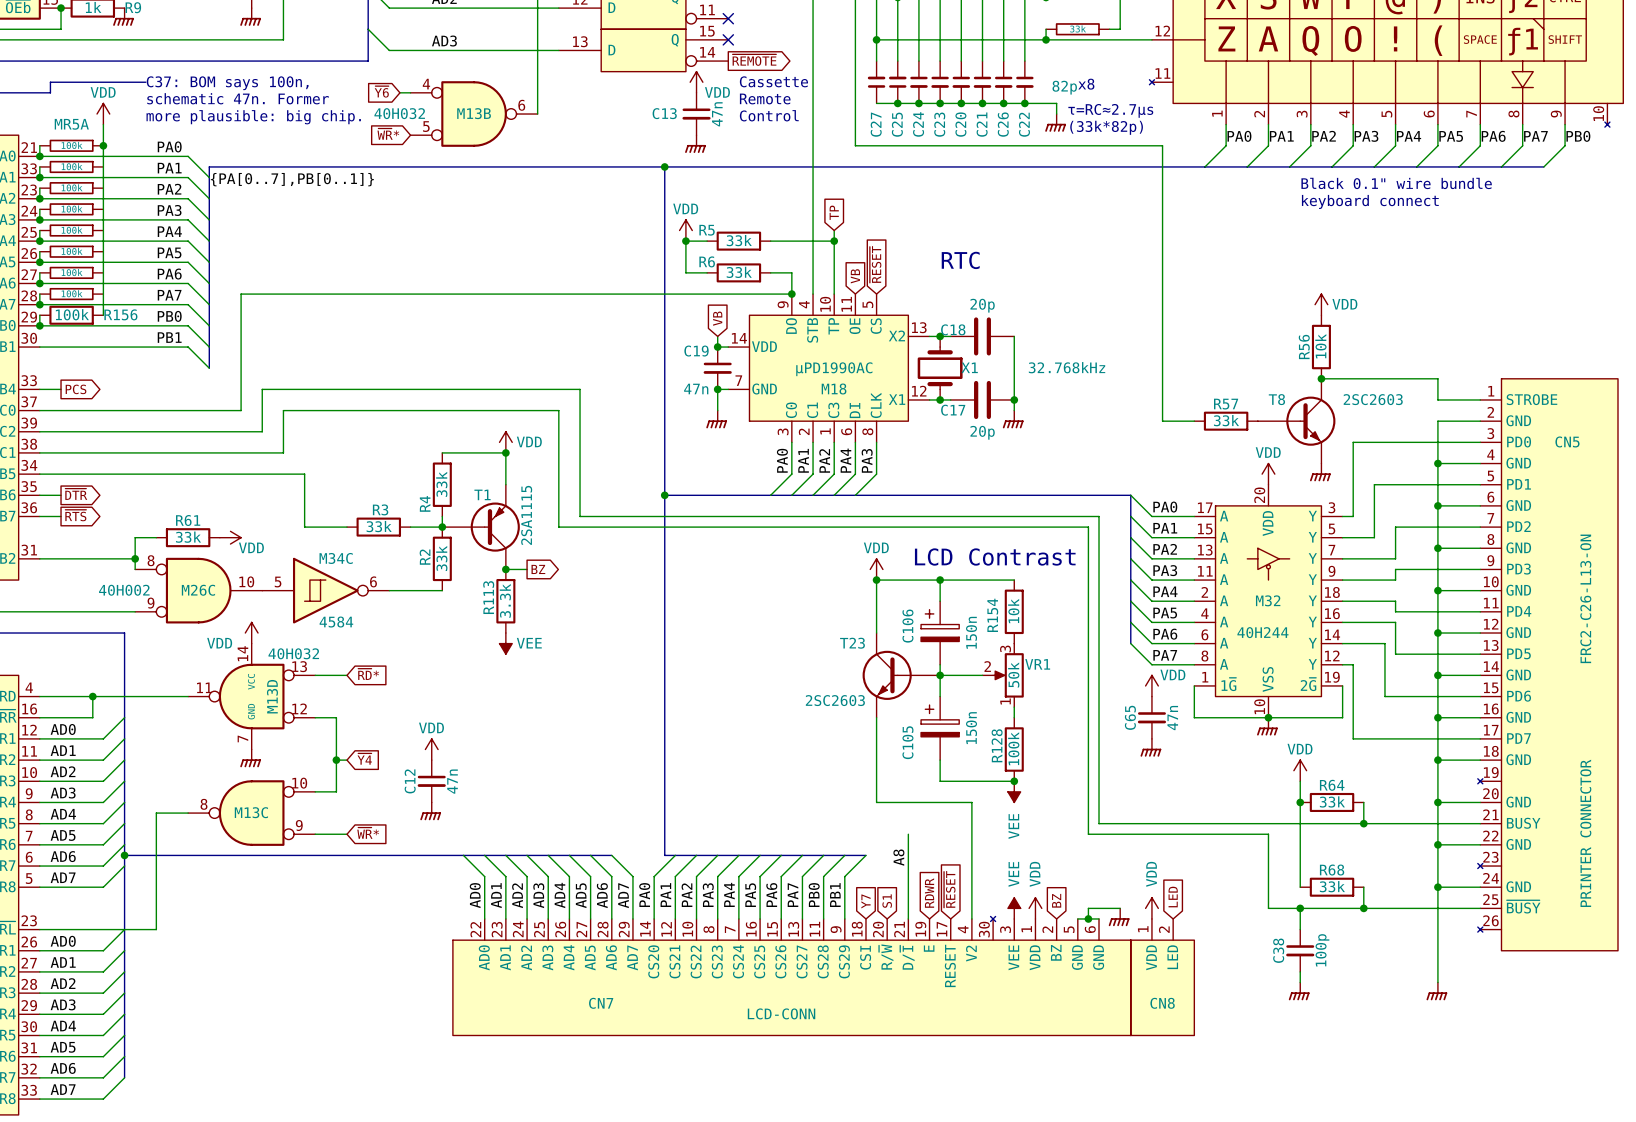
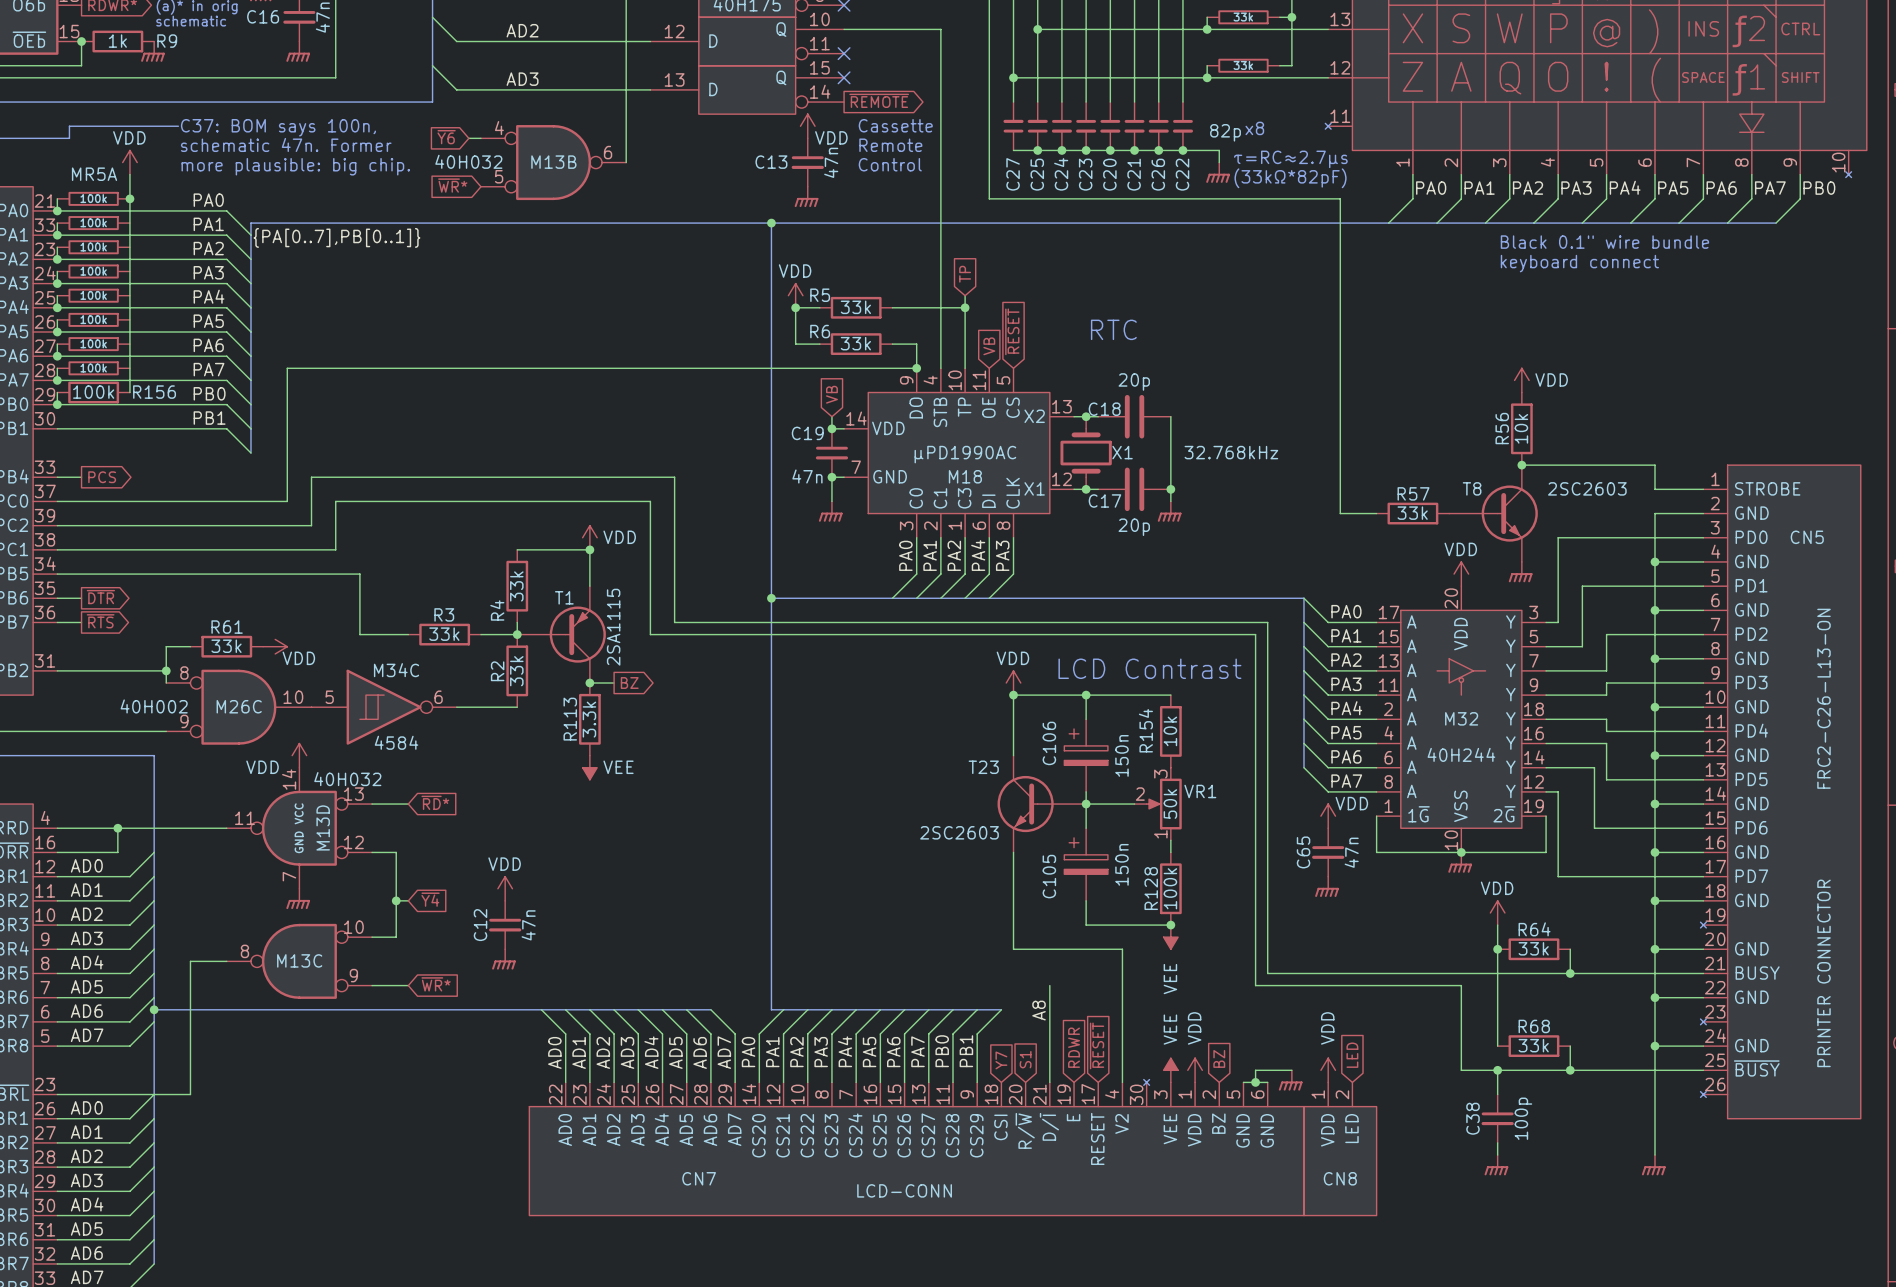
text: (33k*82p) (1106, 127) -> (33kΩ*82pF) (1290, 178)

